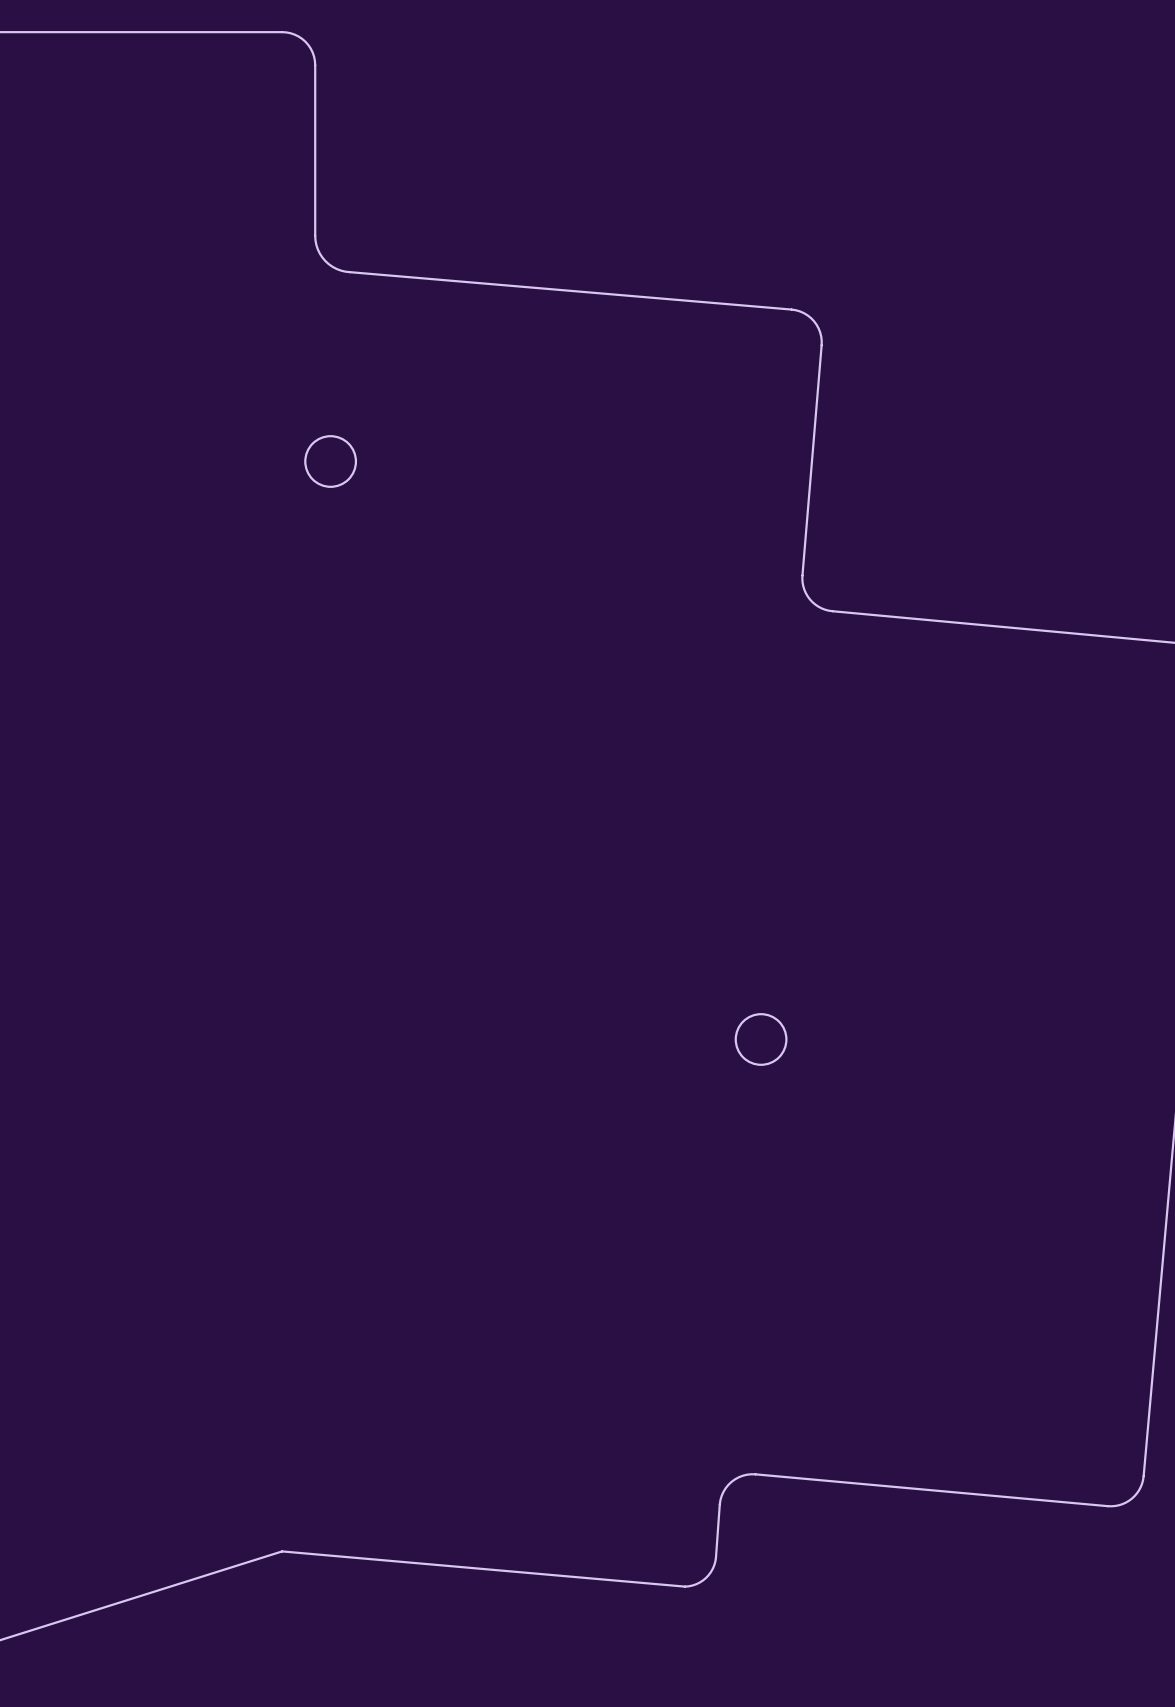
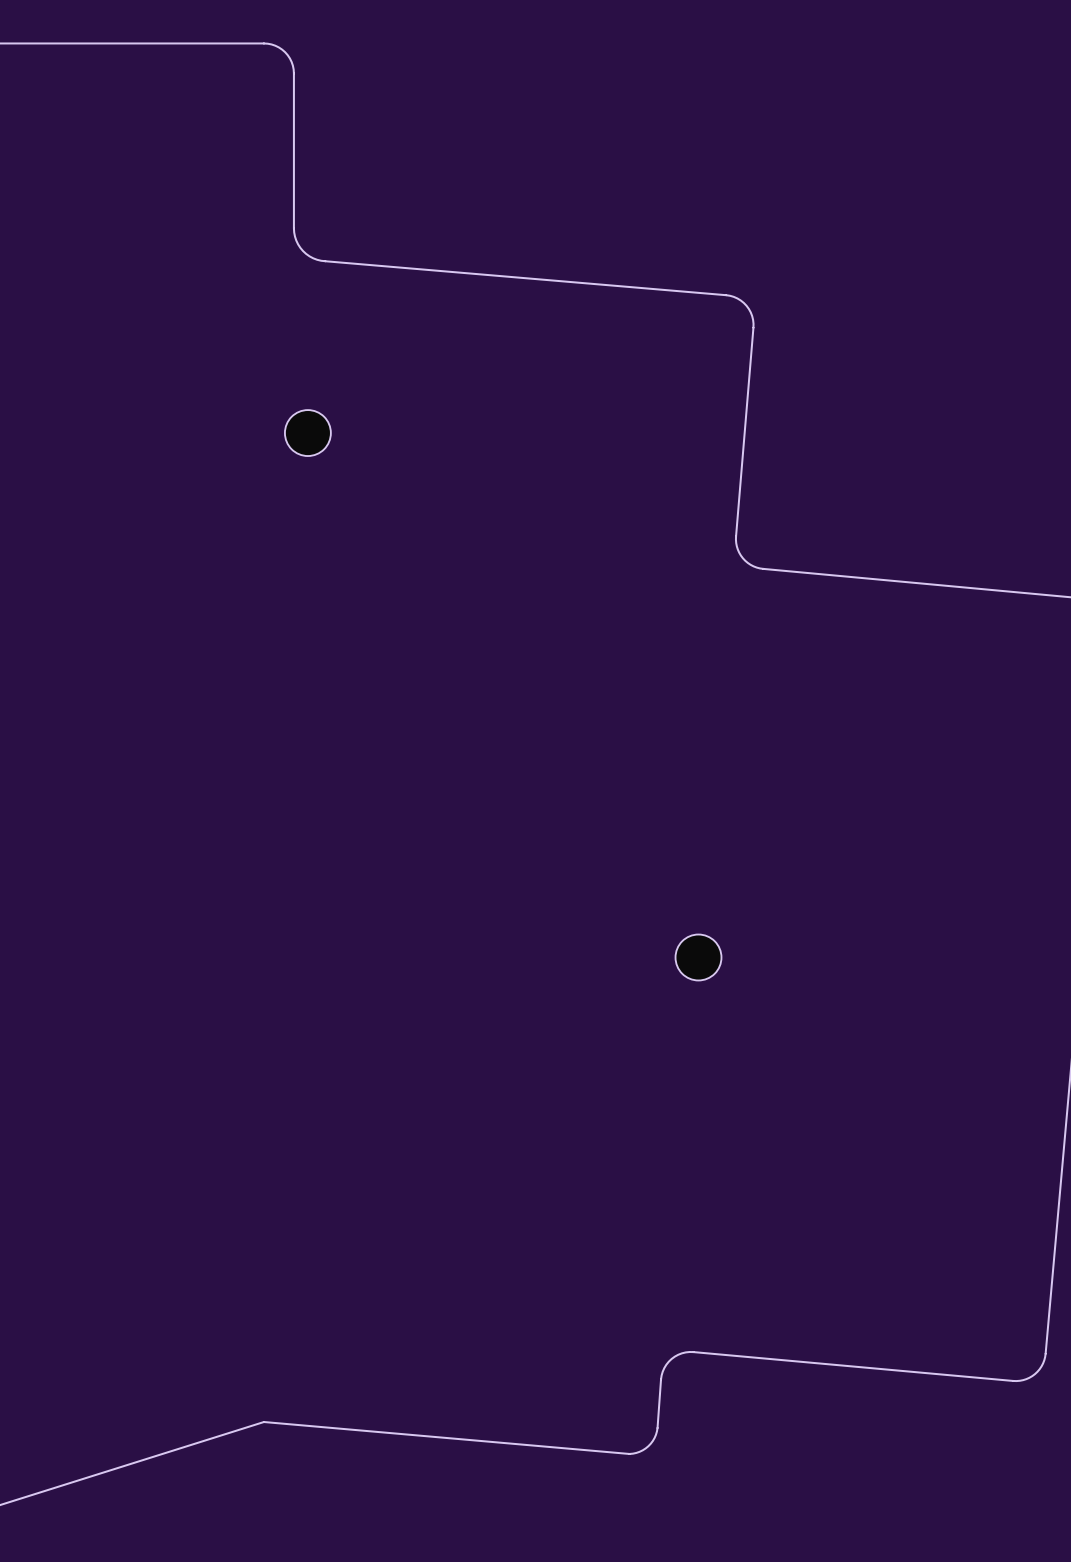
drawing: [304, 435, 358, 488] -> none
part: none -> (307, 433)
drawing: [734, 1013, 788, 1066] -> none
part: none -> (698, 957)

